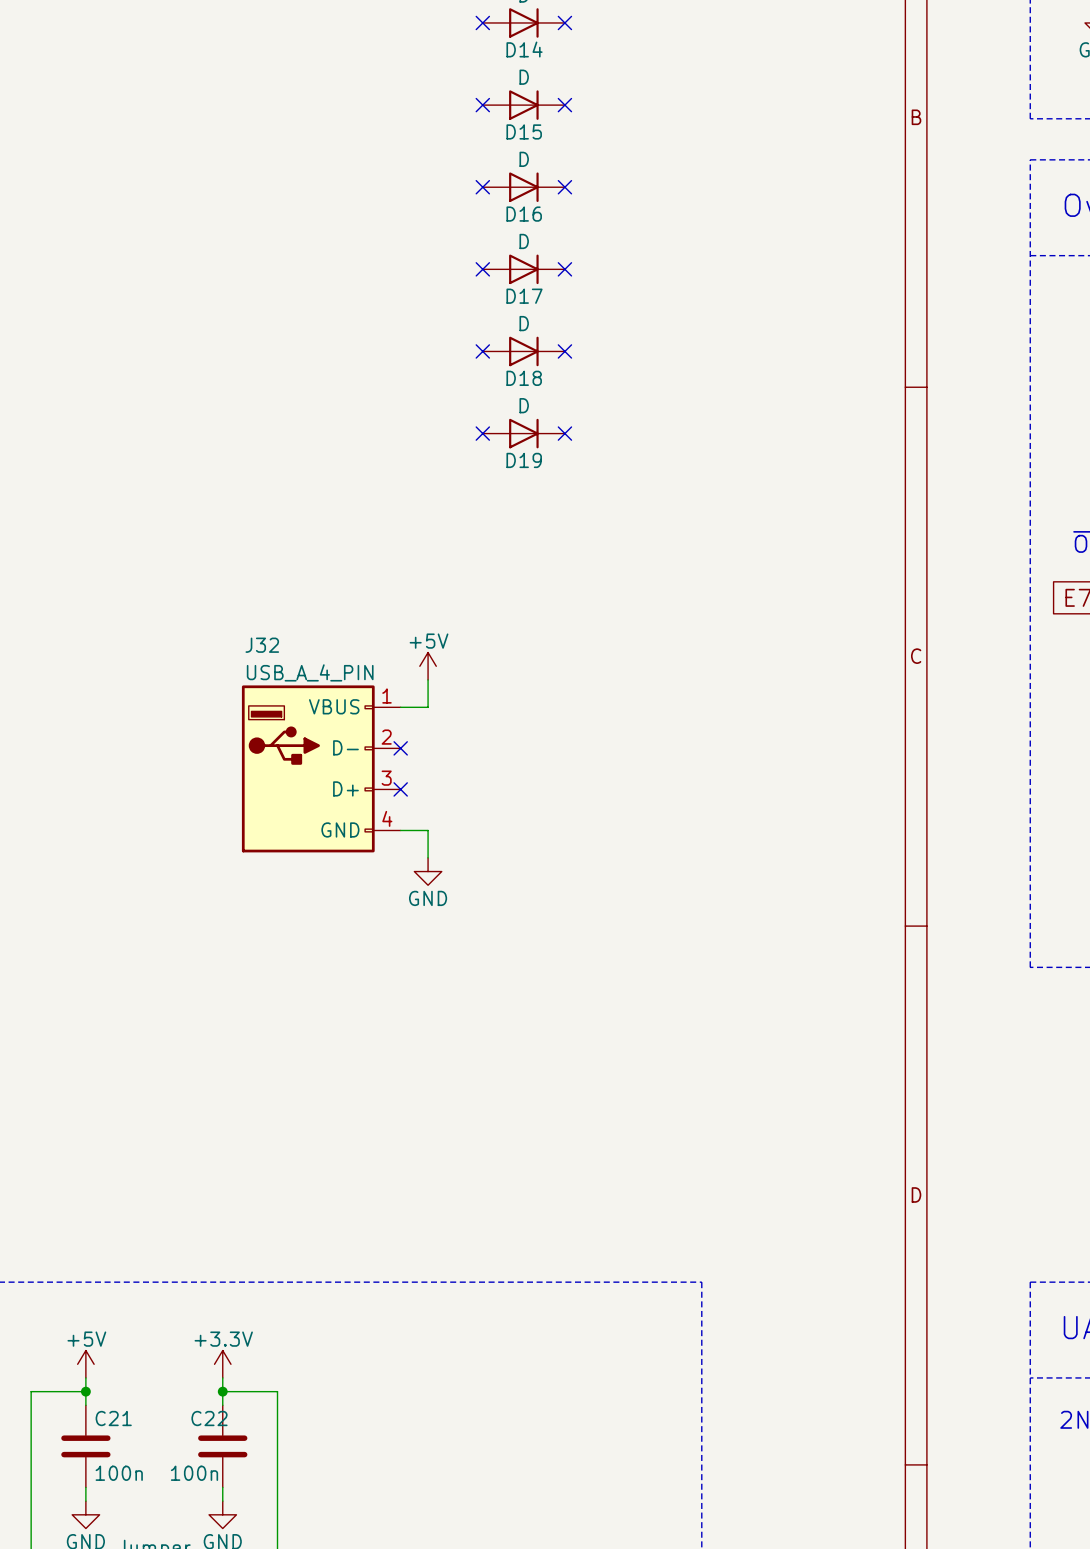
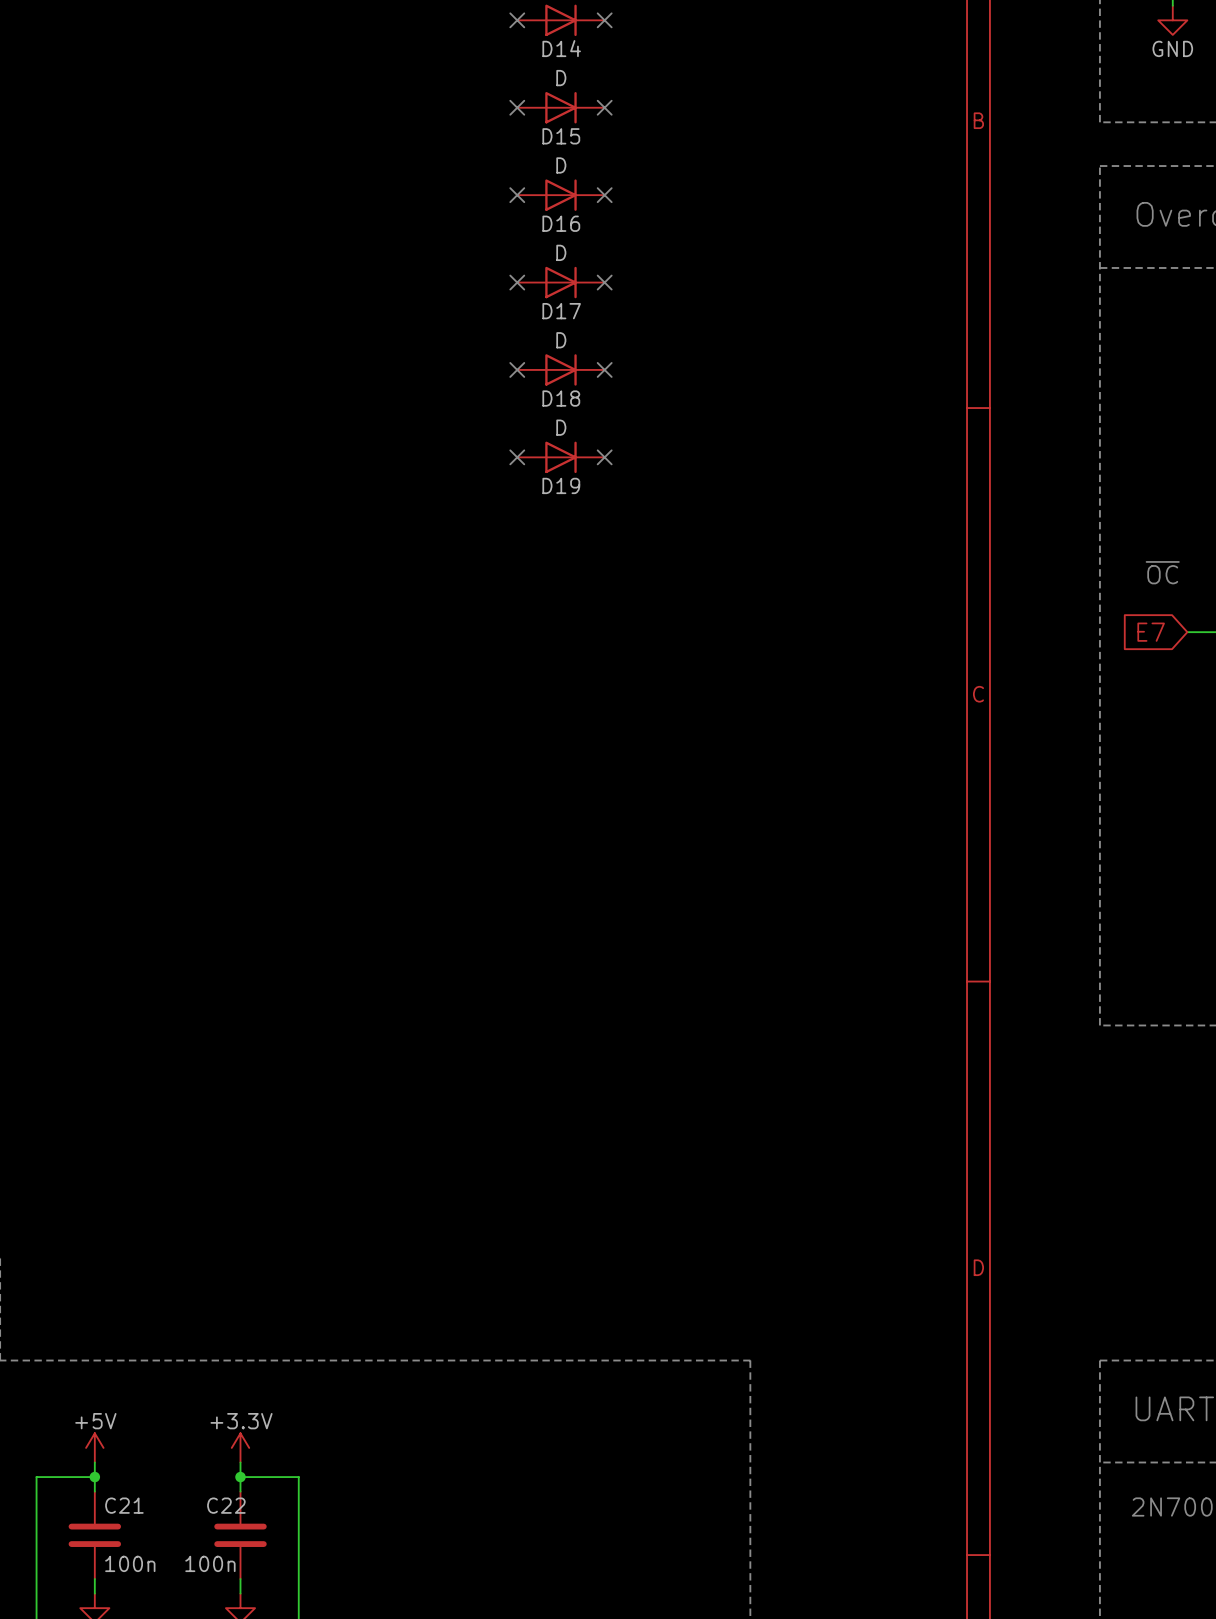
power symbol: +5V (428, 666) -> none
wire: (428, 679) (428, 707) (400, 707) -> none
no-connect mark: (400, 748) -> none
J32: USB_A_4_PIN (321, 768) -> none
no-connect mark: (400, 789) -> none
wire: (400, 830) (428, 830) (428, 857) -> none
power symbol: GND (428, 871) -> none

